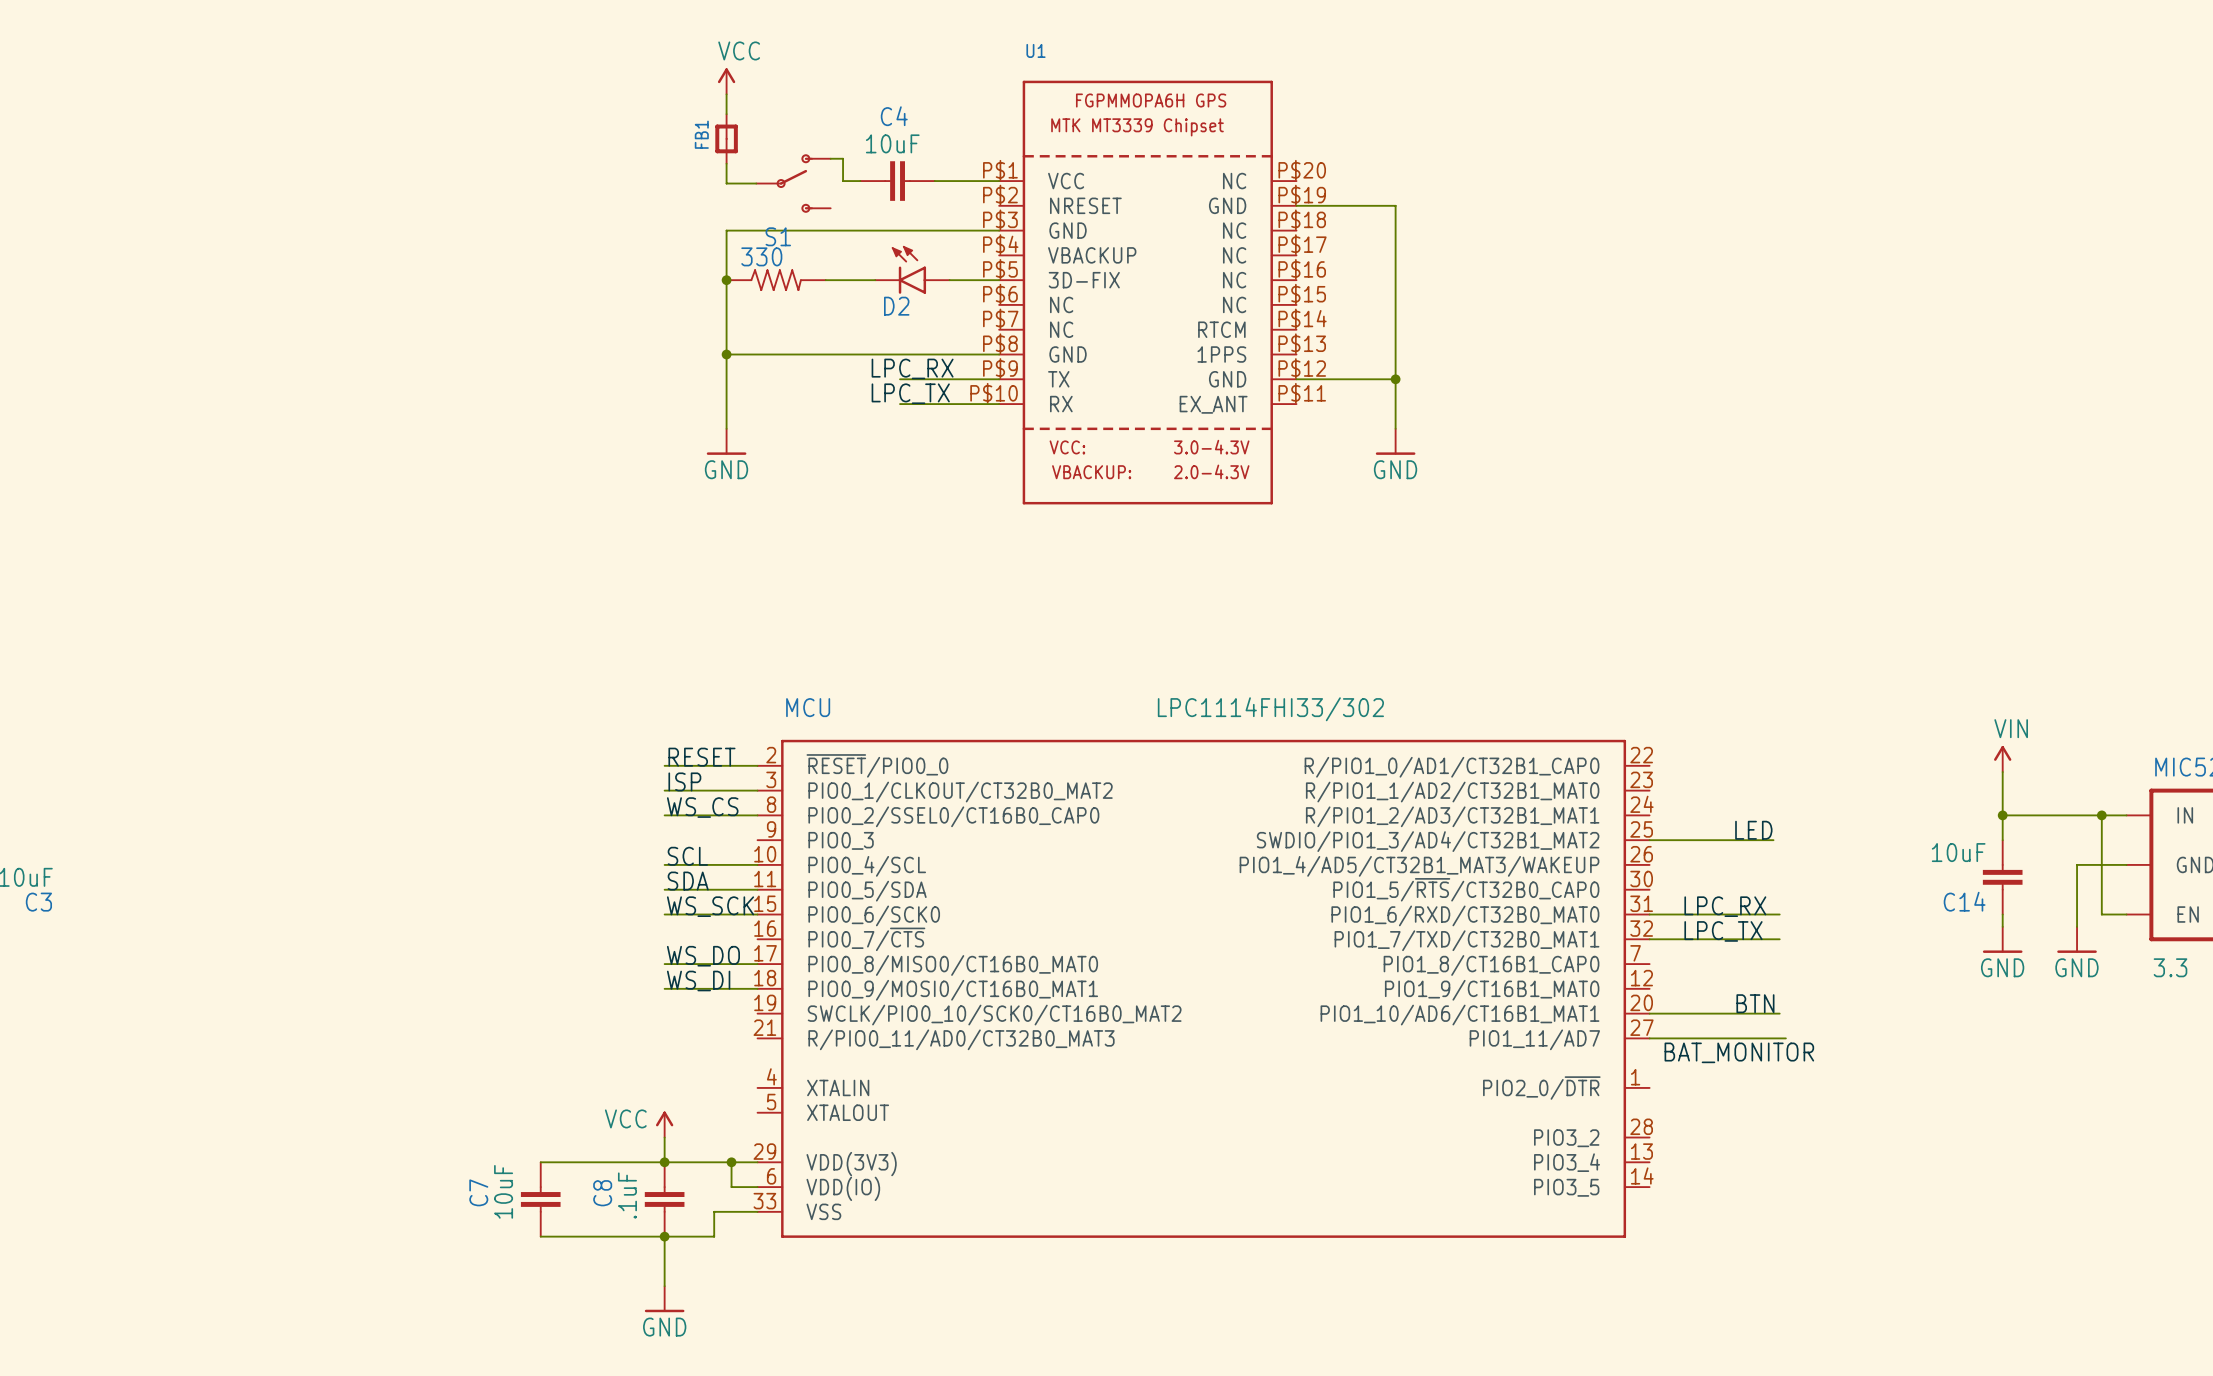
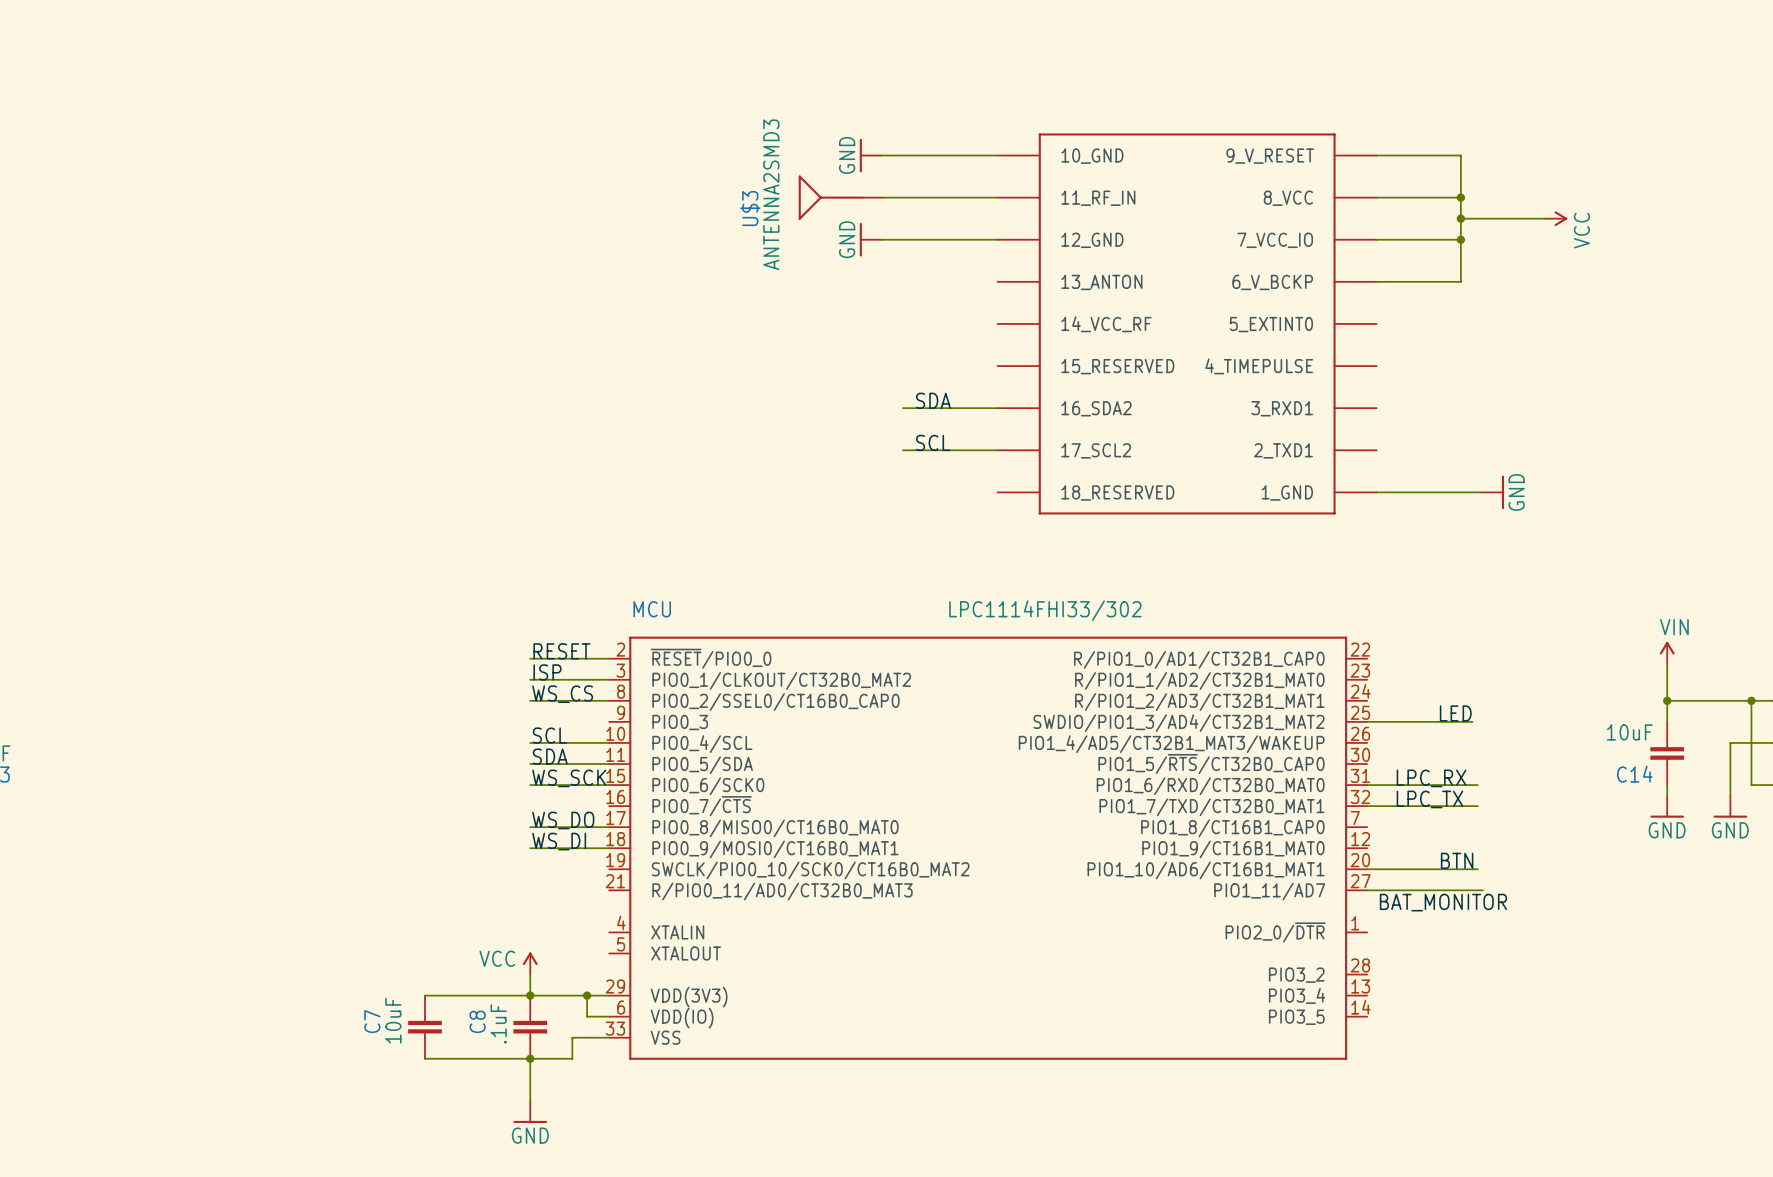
power symbol: VCC (726, 81) -> none
wire: (726, 94) (726, 114) -> none
FB1: (726, 138) -> none
wire: (830, 158) (843, 158) (843, 181) (860, 181) -> none
wire: (726, 163) (726, 183) (756, 183) -> none
power symbol: none -> GND (870, 155)
wire: none -> (881, 155) (997, 155)
wire: none -> (1376, 155) (1460, 155) (1460, 281) (1376, 281)
C4: 10uF (897, 181) -> none
wire: (934, 181) (999, 181) -> none
S1: (793, 183) -> none
wire: (1296, 205) (1395, 205) (1395, 428) -> none
U$3: none -> ANTENNA2SMD3 (841, 197)
wire: none -> (883, 197) (997, 197)
wire: none -> (1376, 197) (1460, 197)
junction: none -> (1460, 197)
wire: (999, 230) (726, 230) (726, 428) -> none
wire: none -> (1460, 218) (1545, 218)
junction: none -> (1460, 218)
power symbol: none -> VCC (1556, 218)
D2: (912, 269) -> none
power symbol: none -> GND (870, 239)
wire: none -> (881, 239) (997, 239)
wire: none -> (1376, 239) (1460, 239)
junction: none -> (1460, 239)
junction: (726, 280) -> none
330: (776, 280) -> none
wire: (825, 280) (875, 280) -> none
wire: (949, 280) (999, 280) -> none
U1: (1147, 292) -> none
wire: (726, 354) (999, 354) -> none
junction: (726, 354) -> none
label: LPC_RX (912, 368) -> none
part: none -> (1187, 323)
wire: (900, 379) (999, 379) -> none
wire: (1296, 379) (1395, 379) -> none
junction: (1395, 379) -> none
label: LPC_TX (910, 393) -> none
wire: (900, 404) (999, 404) -> none
power symbol: GND (726, 441) -> none
power symbol: GND (1395, 441) -> none
label: none -> SDA (933, 400)
wire: none -> (902, 408) (997, 408)
label: none -> SCL (933, 442)
wire: none -> (902, 450) (997, 450)
wire: none -> (1376, 492) (1481, 492)
power symbol: none -> GND (1492, 492)

